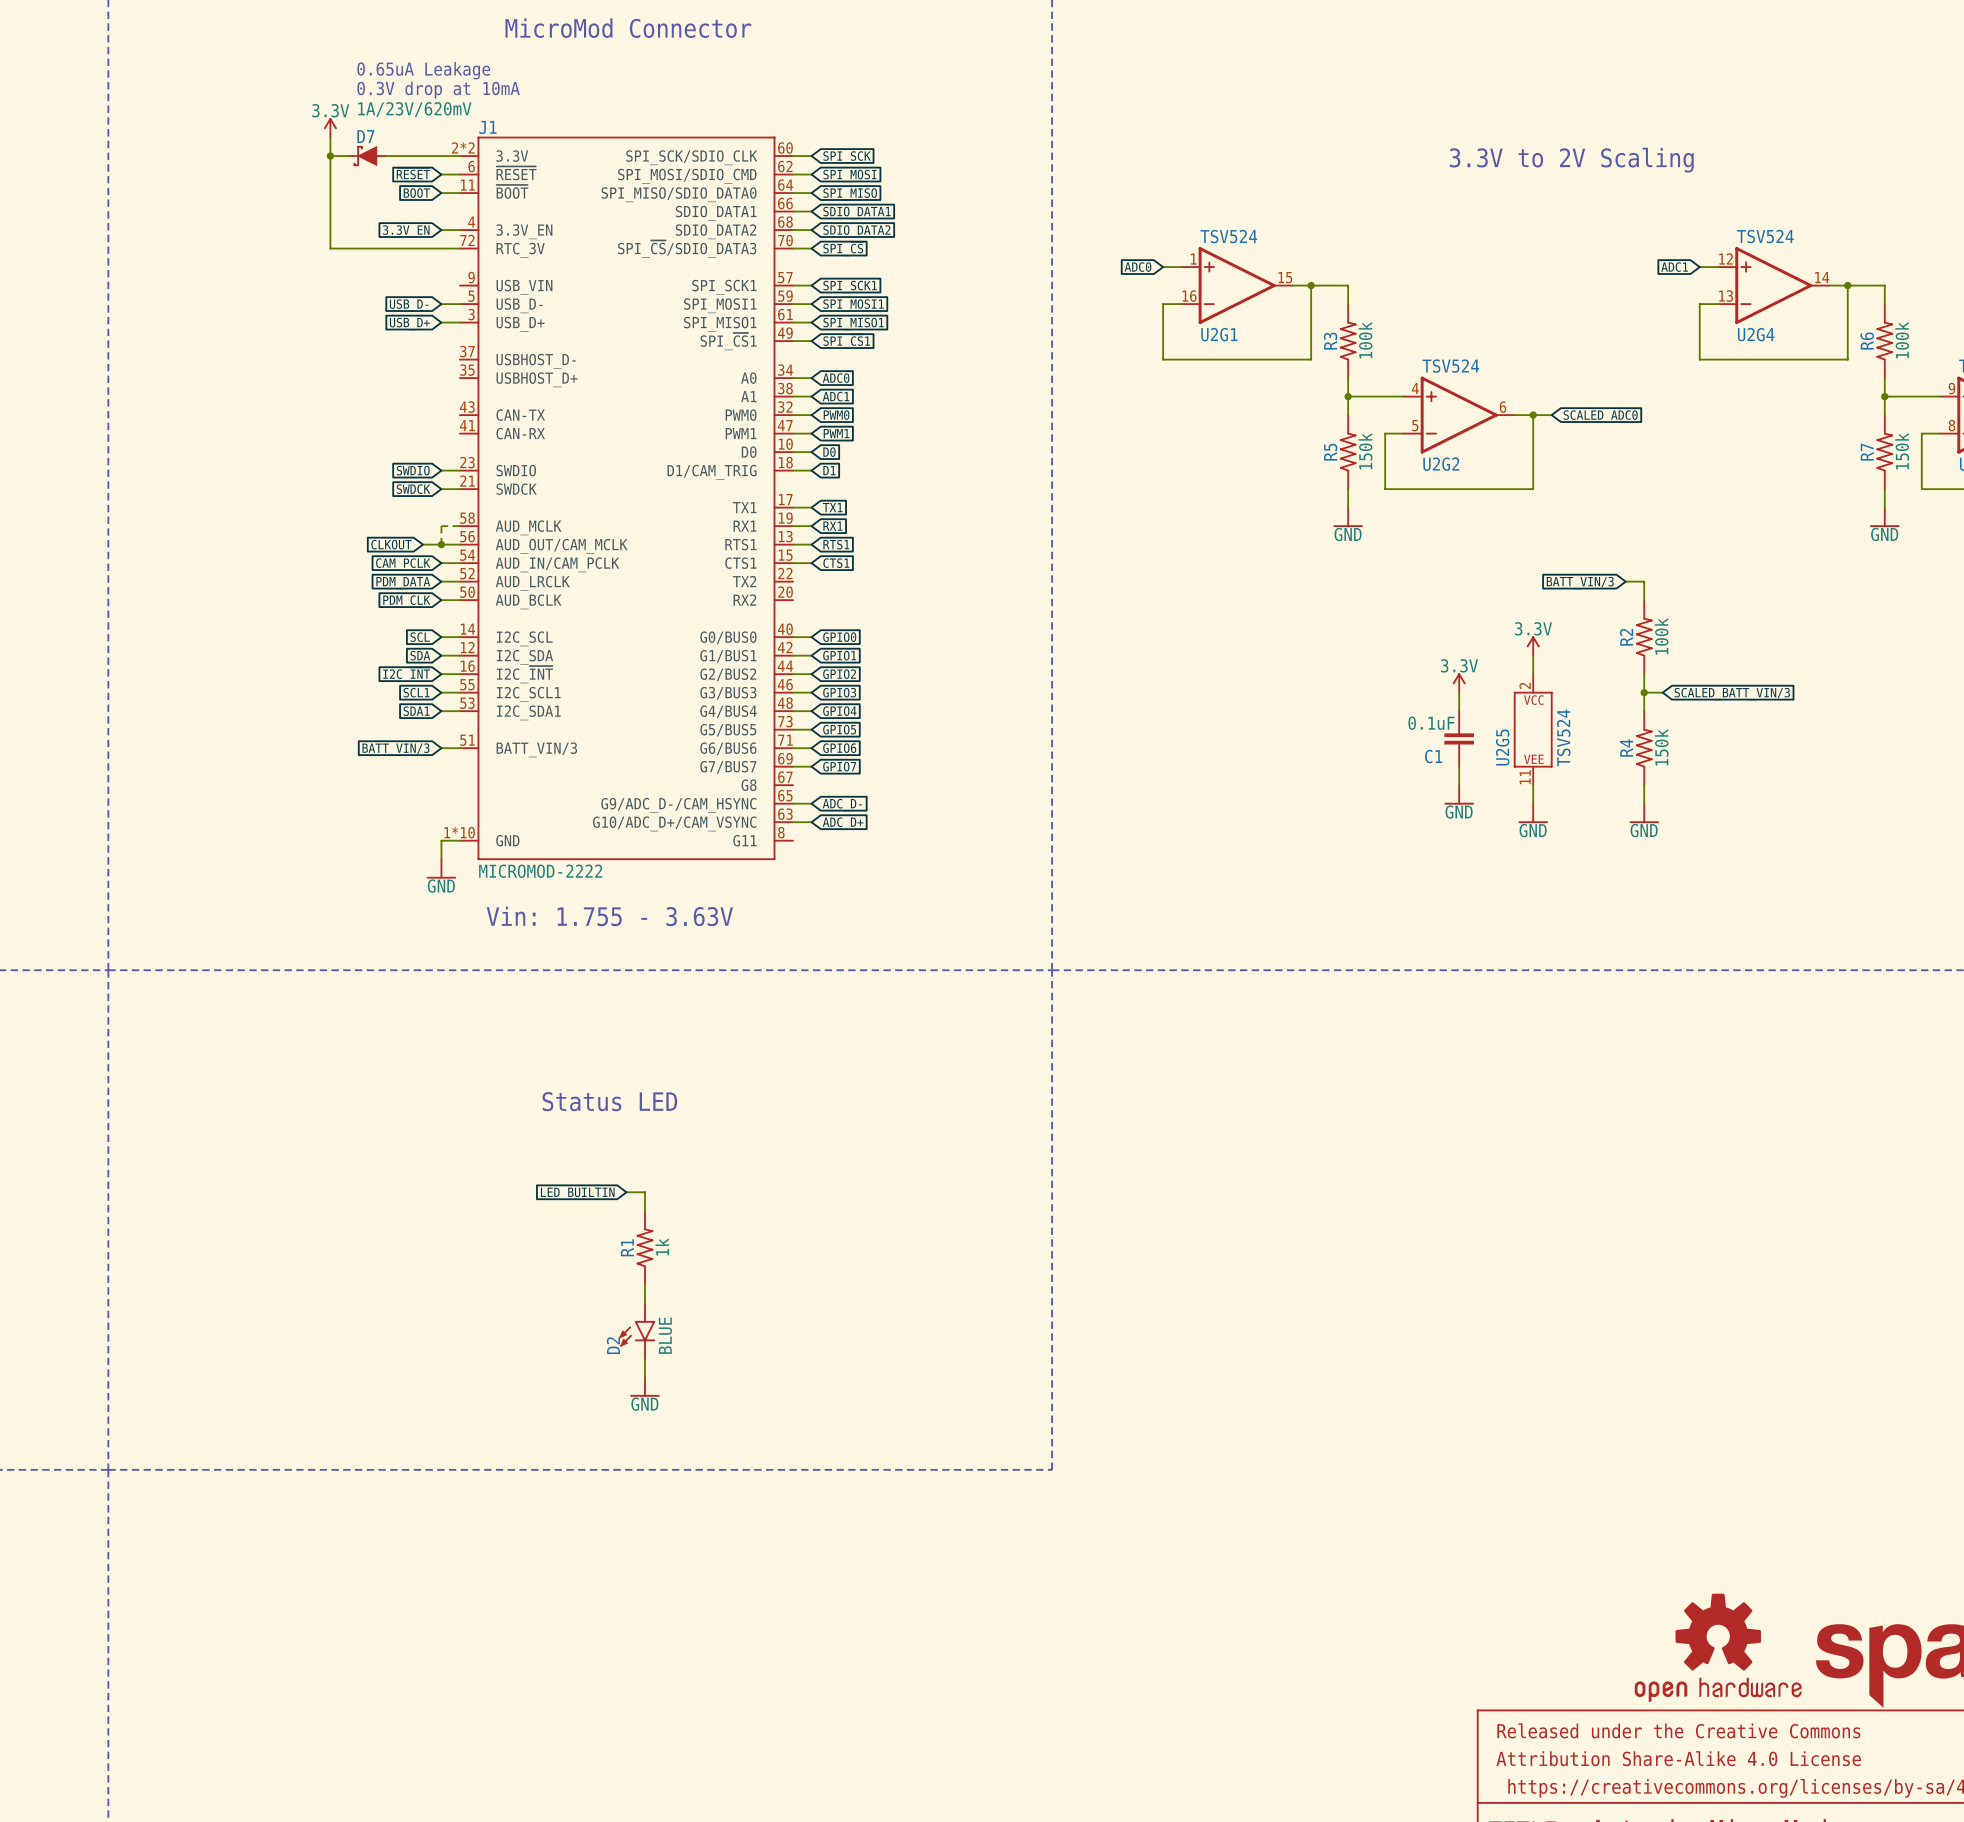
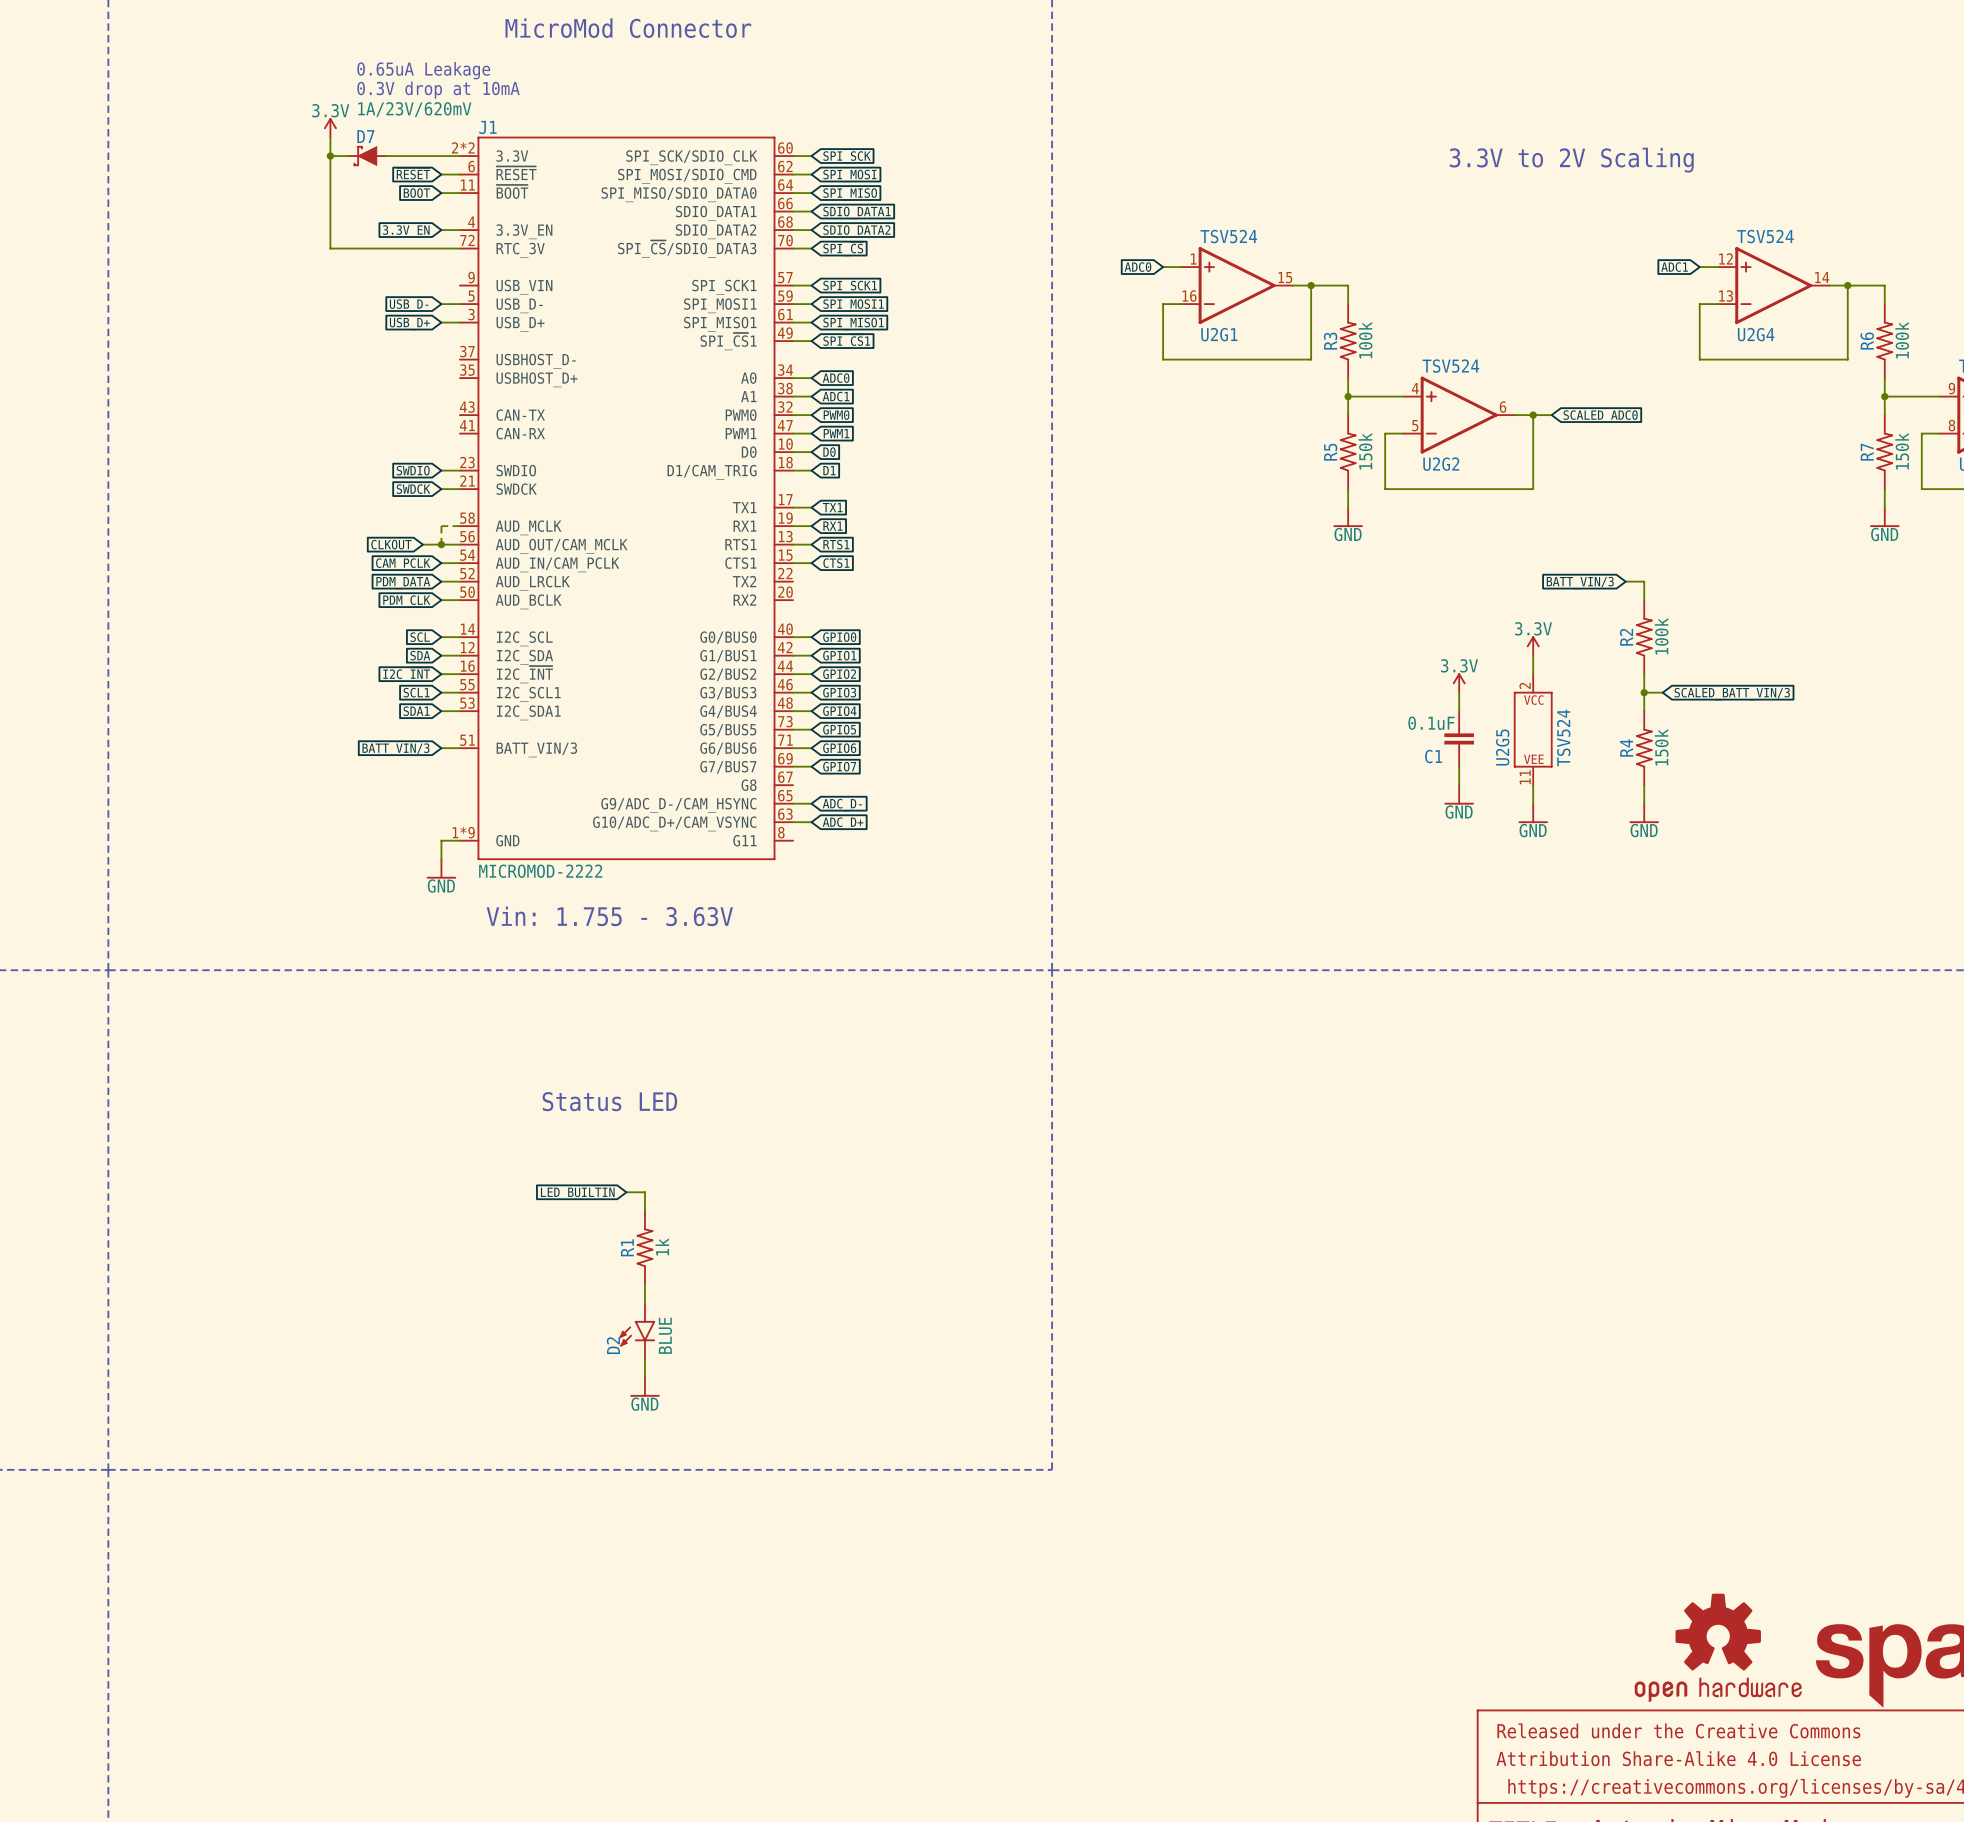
J1 pin number: 1*10 (459, 832) -> 1*9 (463, 832)

